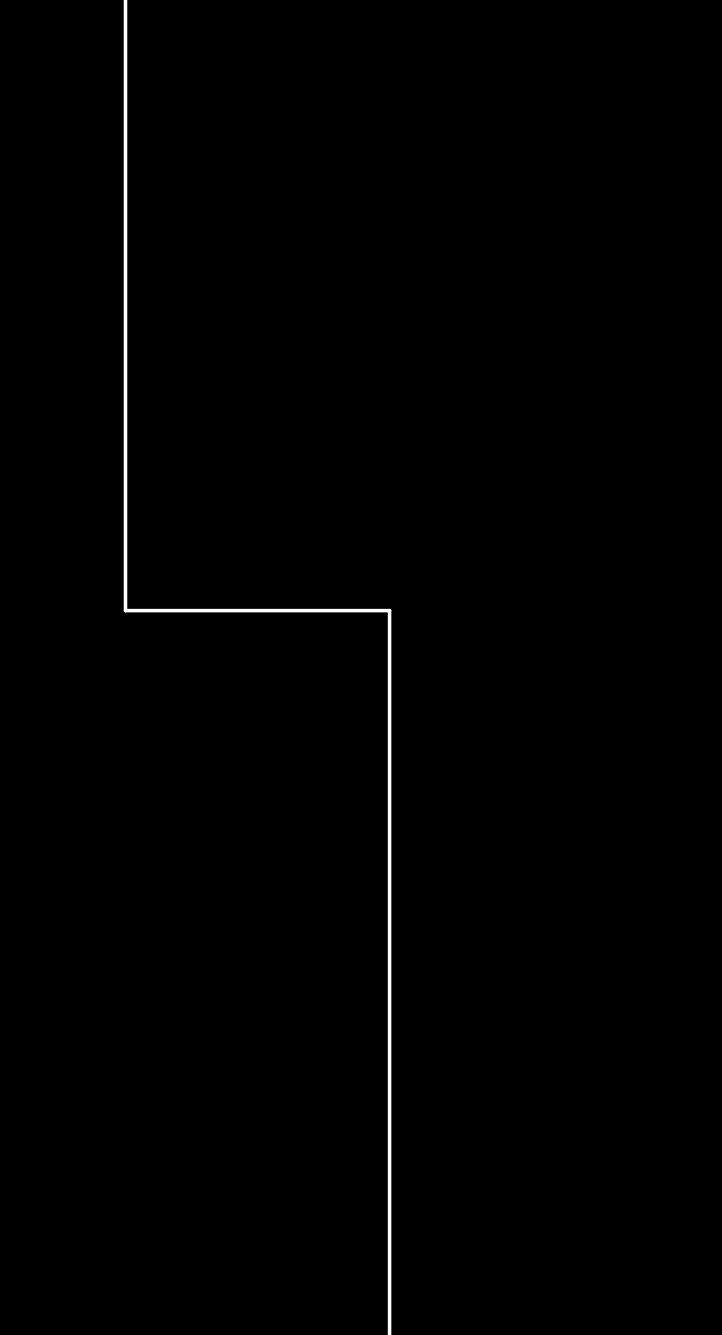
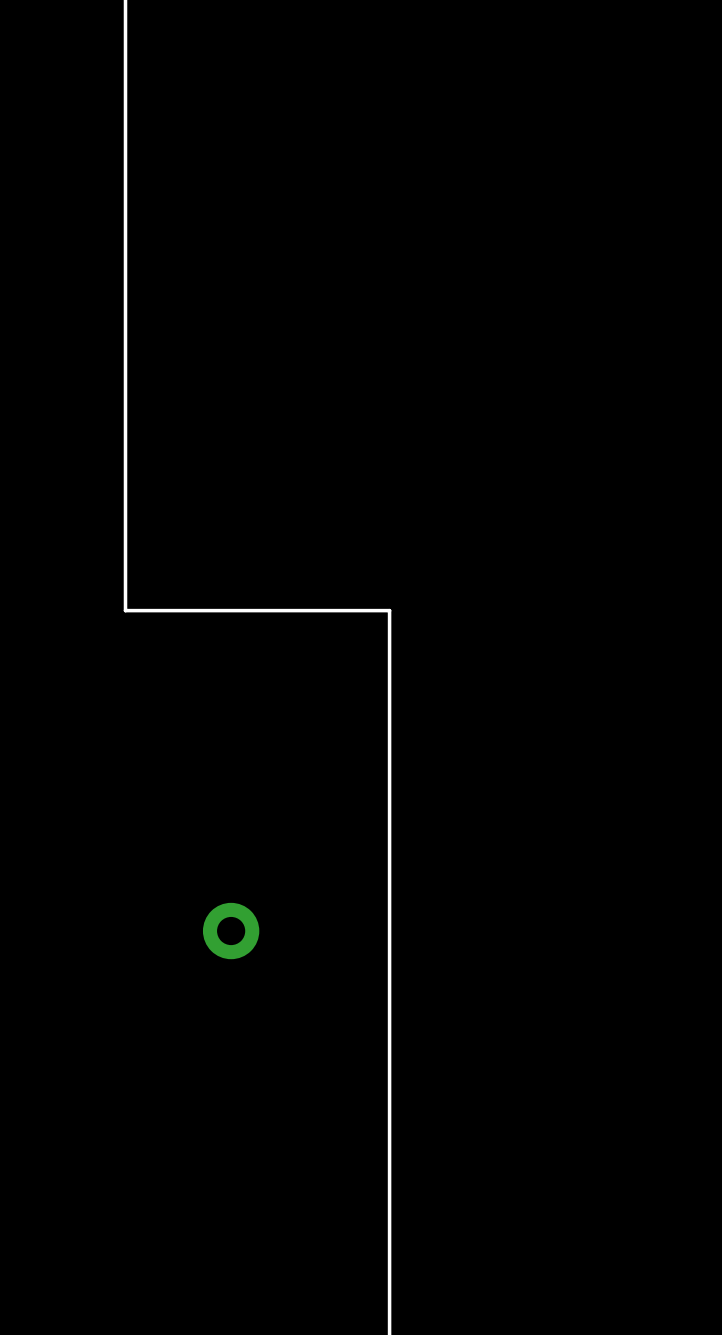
via: none -> (231, 931)

